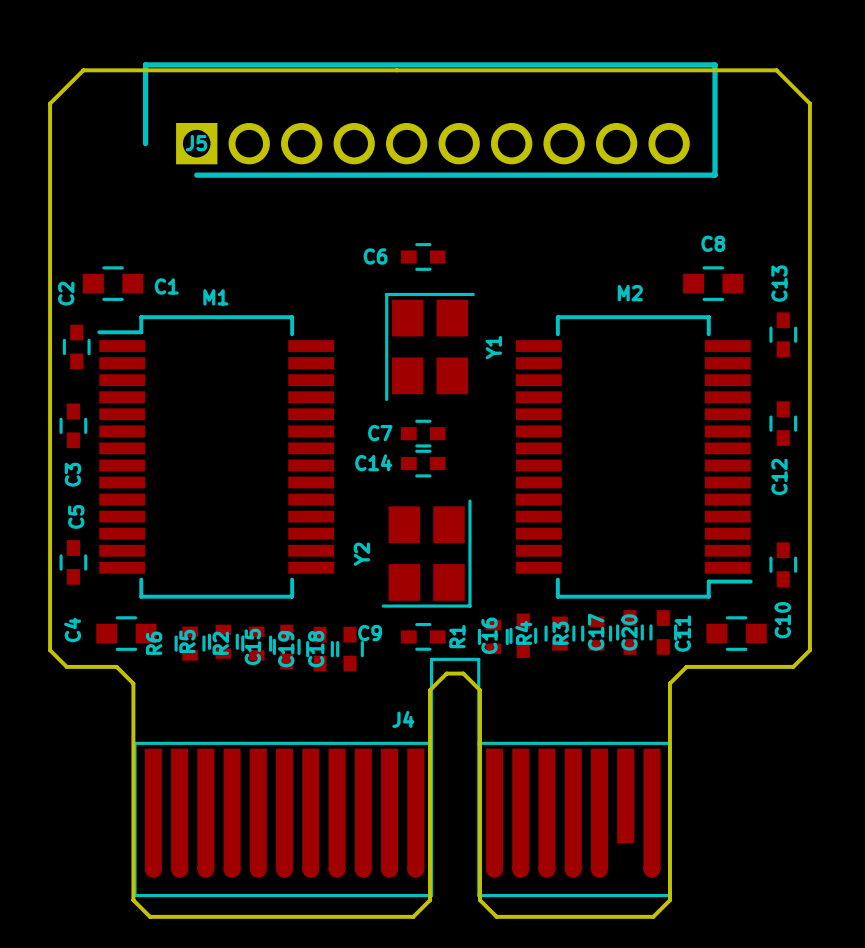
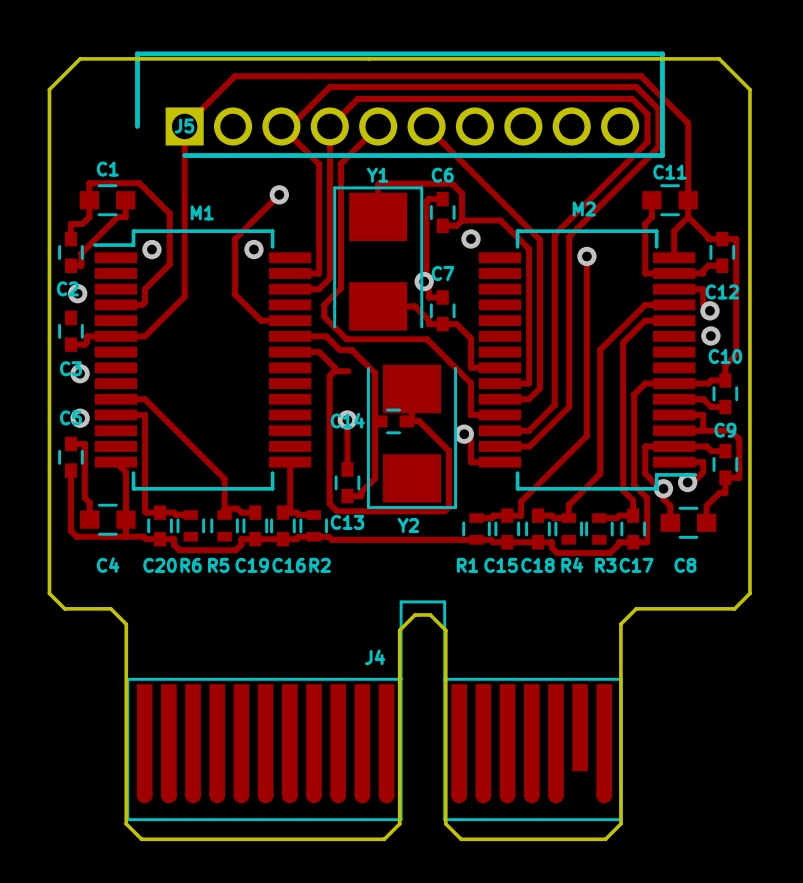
track: none -> (281, 126) (319, 164) (319, 273) (290, 273)
track: none -> (378, 126) (340, 163) (340, 288) (324, 304) (324, 316) (346, 339) (427, 339) (470, 383) (470, 415) (500, 415)
track: none -> (426, 126) (539, 239) (539, 388) (529, 399) (500, 399)
track: none -> (285, 130) (329, 87) (636, 87) (658, 108) (658, 147) (569, 236) (569, 406) (529, 446) (500, 446)
track: none -> (279, 194) (235, 239) (235, 294) (261, 320) (290, 320)
via: none -> (279, 194)
track: none -> (442, 199) (428, 199) (426, 201) (426, 281)
track: none -> (125, 200) (125, 217) (117, 217) (81, 253) (81, 265) (70, 265)
track: none -> (651, 200) (651, 217) (645, 223) (645, 273) (703, 273) (708, 265) (722, 265)
track: none -> (378, 216) (379, 183) (452, 183) (461, 193) (461, 220)
track: none -> (688, 217) (674, 231) (674, 257)
track: none -> (688, 217) (688, 123) (641, 76) (234, 76) (184, 126) (184, 296) (145, 336) (86, 336) (86, 342) (84, 344) (70, 344)
track: none -> (688, 217) (708, 239) (736, 239) (736, 354) (725, 365) (725, 380) (711, 380) (708, 383) (645, 383) (634, 394) (634, 485) (647, 498) (647, 542) (619, 542) (610, 552) (557, 552) (551, 547) (551, 542) (493, 542) (491, 539) (331, 539) (328, 536) (298, 536) (296, 539) (241, 539) (241, 544) (235, 550) (179, 550) (173, 544) (173, 539) (146, 539) (143, 536) (76, 536) (70, 530) (70, 470)
C8 name position: C8 (713, 243) -> C8 (685, 565)
track: none -> (461, 220) (500, 220) (529, 249) (529, 383) (500, 383)
track: none -> (461, 220) (456, 225) (442, 225)
C6 rotation: 0° (423, 256) -> 90° clockwise (442, 212)
C6 position: (423, 256) -> (442, 212)
track: none -> (70, 239) (70, 224) (82, 224) (89, 217) (89, 183) (139, 183) (169, 213) (169, 264) (145, 289) (145, 302) (142, 304) (115, 304)
via: none -> (470, 239)
via: none -> (151, 249)
via: none -> (253, 249)
C1 position: (113, 283) -> (107, 200)
C8 position: (713, 283) -> (688, 522)
C13 name rotation: 0° (779, 283) -> 90° clockwise (347, 522)
C13 name position: C13 (779, 283) -> C13 (347, 522)
track: none -> (586, 256) (586, 435) (521, 501) (521, 515) (493, 515) (491, 518) (476, 518)
via: none -> (586, 256)
C1 name position: C1 (166, 286) -> C1 (107, 169)
Y1 footprint: [385, 292, 475, 402] -> [333, 186, 424, 331]
C2 name rotation: 0° (66, 293) -> 90° clockwise (67, 288)
via: none -> (424, 281)
track: none -> (426, 281) (428, 283) (428, 297) (442, 297)
track: none -> (290, 289) (319, 289) (330, 278) (330, 126) (357, 98) (632, 98) (647, 114) (647, 142) (554, 234) (554, 405) (529, 430) (500, 430)
track: none -> (674, 289) (703, 289) (703, 304) (709, 310)
via: none -> (77, 293)
C13 position: (783, 334) -> (347, 482)
track: none -> (674, 304) (645, 304) (600, 349) (600, 473) (568, 505) (568, 518) (537, 515)
track: none -> (378, 306) (415, 306) (428, 320) (428, 324) (456, 324) (470, 338) (470, 367) (500, 367)
via: none -> (709, 310)
C2 position: (76, 346) -> (70, 252)
Y1 name position: Y1 (493, 347) -> Y1 (377, 175)
track: none -> (674, 320) (645, 320) (623, 342) (623, 490) (633, 500) (633, 515) (599, 518)
via: none -> (710, 335)
track: none -> (290, 336) (326, 336) (340, 350) (352, 350) (375, 373) (375, 478) (361, 492) (361, 496) (347, 496)
track: none -> (290, 352) (319, 352) (334, 367) (334, 371)
track: none -> (334, 371) (348, 371)
track: none -> (334, 371) (329, 376) (329, 503) (337, 511) (444, 511) (448, 507) (448, 450) (419, 421) (411, 421) (411, 388)
via: none -> (80, 373)
C12 position: (783, 423) -> (722, 252)
C3 position: (73, 425) -> (70, 331)
C7 rotation: 0° (423, 433) -> 90° clockwise (442, 310)
C7 position: (423, 433) -> (442, 310)
track: none -> (115, 399) (145, 399) (224, 478) (224, 515)
track: none -> (674, 399) (703, 399) (711, 407) (725, 407)
track: none -> (115, 415) (145, 415) (145, 511) (190, 515)
M1 position: (215, 456) -> (202, 359)
M2 position: (634, 456) -> (588, 359)
track: none -> (674, 415) (703, 415) (703, 430)
via: none -> (80, 418)
track: none -> (347, 419) (347, 469)
via: none -> (347, 419)
track: none -> (674, 430) (730, 430) (739, 439) (739, 477) (725, 477) (725, 492) (719, 492) (706, 505) (706, 522)
C3 name rotation: 0° (72, 474) -> 90° clockwise (70, 368)
C12 name rotation: 0° (779, 476) -> 90° clockwise (722, 291)
track: none -> (464, 434) (470, 440) (470, 462) (500, 462)
via: none -> (464, 434)
track: none -> (70, 443) (84, 443) (84, 498) (89, 502) (89, 519)
track: none -> (725, 451) (711, 451) (706, 446) (645, 446) (645, 473) (660, 488) (663, 488) (663, 498) (670, 505) (670, 522)
Y2 footprint: [381, 499, 472, 608] -> [367, 364, 457, 509]
track: none -> (115, 462) (125, 472) (125, 536)
track: none -> (290, 462) (290, 512)
track: none -> (674, 462) (703, 462) (703, 472) (692, 482) (687, 482)
C5 name rotation: 0° (76, 516) -> 90° clockwise (70, 417)
via: none -> (687, 482)
via: none -> (663, 488)
Y2 name position: Y2 (361, 554) -> Y2 (408, 525)
track: none -> (224, 508) (237, 508) (241, 512) (255, 512)
C5 position: (73, 562) -> (70, 457)
track: none -> (282, 512) (313, 515)
C10 position: (783, 564) -> (725, 393)
C10 name rotation: 0° (782, 620) -> 90° clockwise (725, 356)
C10 name position: C10 (782, 620) -> C10 (725, 356)
C4 name rotation: 0° (72, 629) -> 90° clockwise (108, 565)
C4 name position: C4 (72, 629) -> C4 (108, 565)
R4 name rotation: 0° (523, 632) -> 90° clockwise (572, 565)
R4 name position: R4 (523, 632) -> R4 (572, 565)
C17 name rotation: 0° (596, 632) -> 90° clockwise (636, 565)
C17 name position: C17 (596, 632) -> C17 (636, 565)
C17 position: (629, 632) -> (633, 528)
C20 name rotation: 0° (629, 632) -> 90° clockwise (160, 565)
C20 name position: C20 (629, 632) -> C20 (160, 565)
C20 position: (663, 632) -> (160, 525)
C4 position: (126, 633) -> (107, 519)
R4 position: (559, 633) -> (568, 528)
R3 name rotation: 0° (560, 633) -> 90° clockwise (605, 565)
R3 name position: R3 (560, 633) -> R3 (605, 565)
R3 position: (596, 633) -> (599, 528)
C11 name rotation: 0° (682, 633) -> 90° clockwise (670, 172)
C11 name position: C11 (682, 633) -> C11 (670, 172)
C11 position: (736, 633) -> (670, 200)
C16 name rotation: 0° (489, 635) -> 90° clockwise (289, 565)
C16 name position: C16 (489, 635) -> C16 (289, 565)
C16 position: (523, 635) -> (282, 525)
C9 rotation: 0° (423, 636) -> 90° clockwise (725, 464)
C9 position: (423, 636) -> (725, 464)
R1 name rotation: 0° (457, 636) -> 90° clockwise (467, 565)
R1 name position: R1 (457, 636) -> R1 (467, 565)
R1 position: (493, 636) -> (476, 528)
R5 name rotation: 0° (187, 641) -> 90° clockwise (218, 565)
R5 name position: R5 (187, 641) -> R5 (218, 565)
R5 position: (223, 641) -> (224, 525)
R6 name rotation: 0° (154, 643) -> 90° clockwise (191, 565)
R6 name position: R6 (154, 643) -> R6 (191, 565)
R6 position: (190, 643) -> (190, 525)
R2 name rotation: 0° (220, 643) -> 90° clockwise (320, 565)
R2 name position: R2 (220, 643) -> R2 (320, 565)
R2 position: (256, 643) -> (313, 525)
C15 name rotation: 0° (252, 646) -> 90° clockwise (501, 565)
C15 name position: C15 (252, 646) -> C15 (501, 565)
C15 position: (286, 646) -> (507, 528)
C19 name rotation: 0° (286, 649) -> 90° clockwise (252, 565)
C18 name rotation: 0° (316, 649) -> 90° clockwise (537, 565)
C18 name position: C18 (316, 649) -> C18 (537, 565)
C19 position: (320, 649) -> (255, 525)
C18 position: (350, 649) -> (537, 528)

